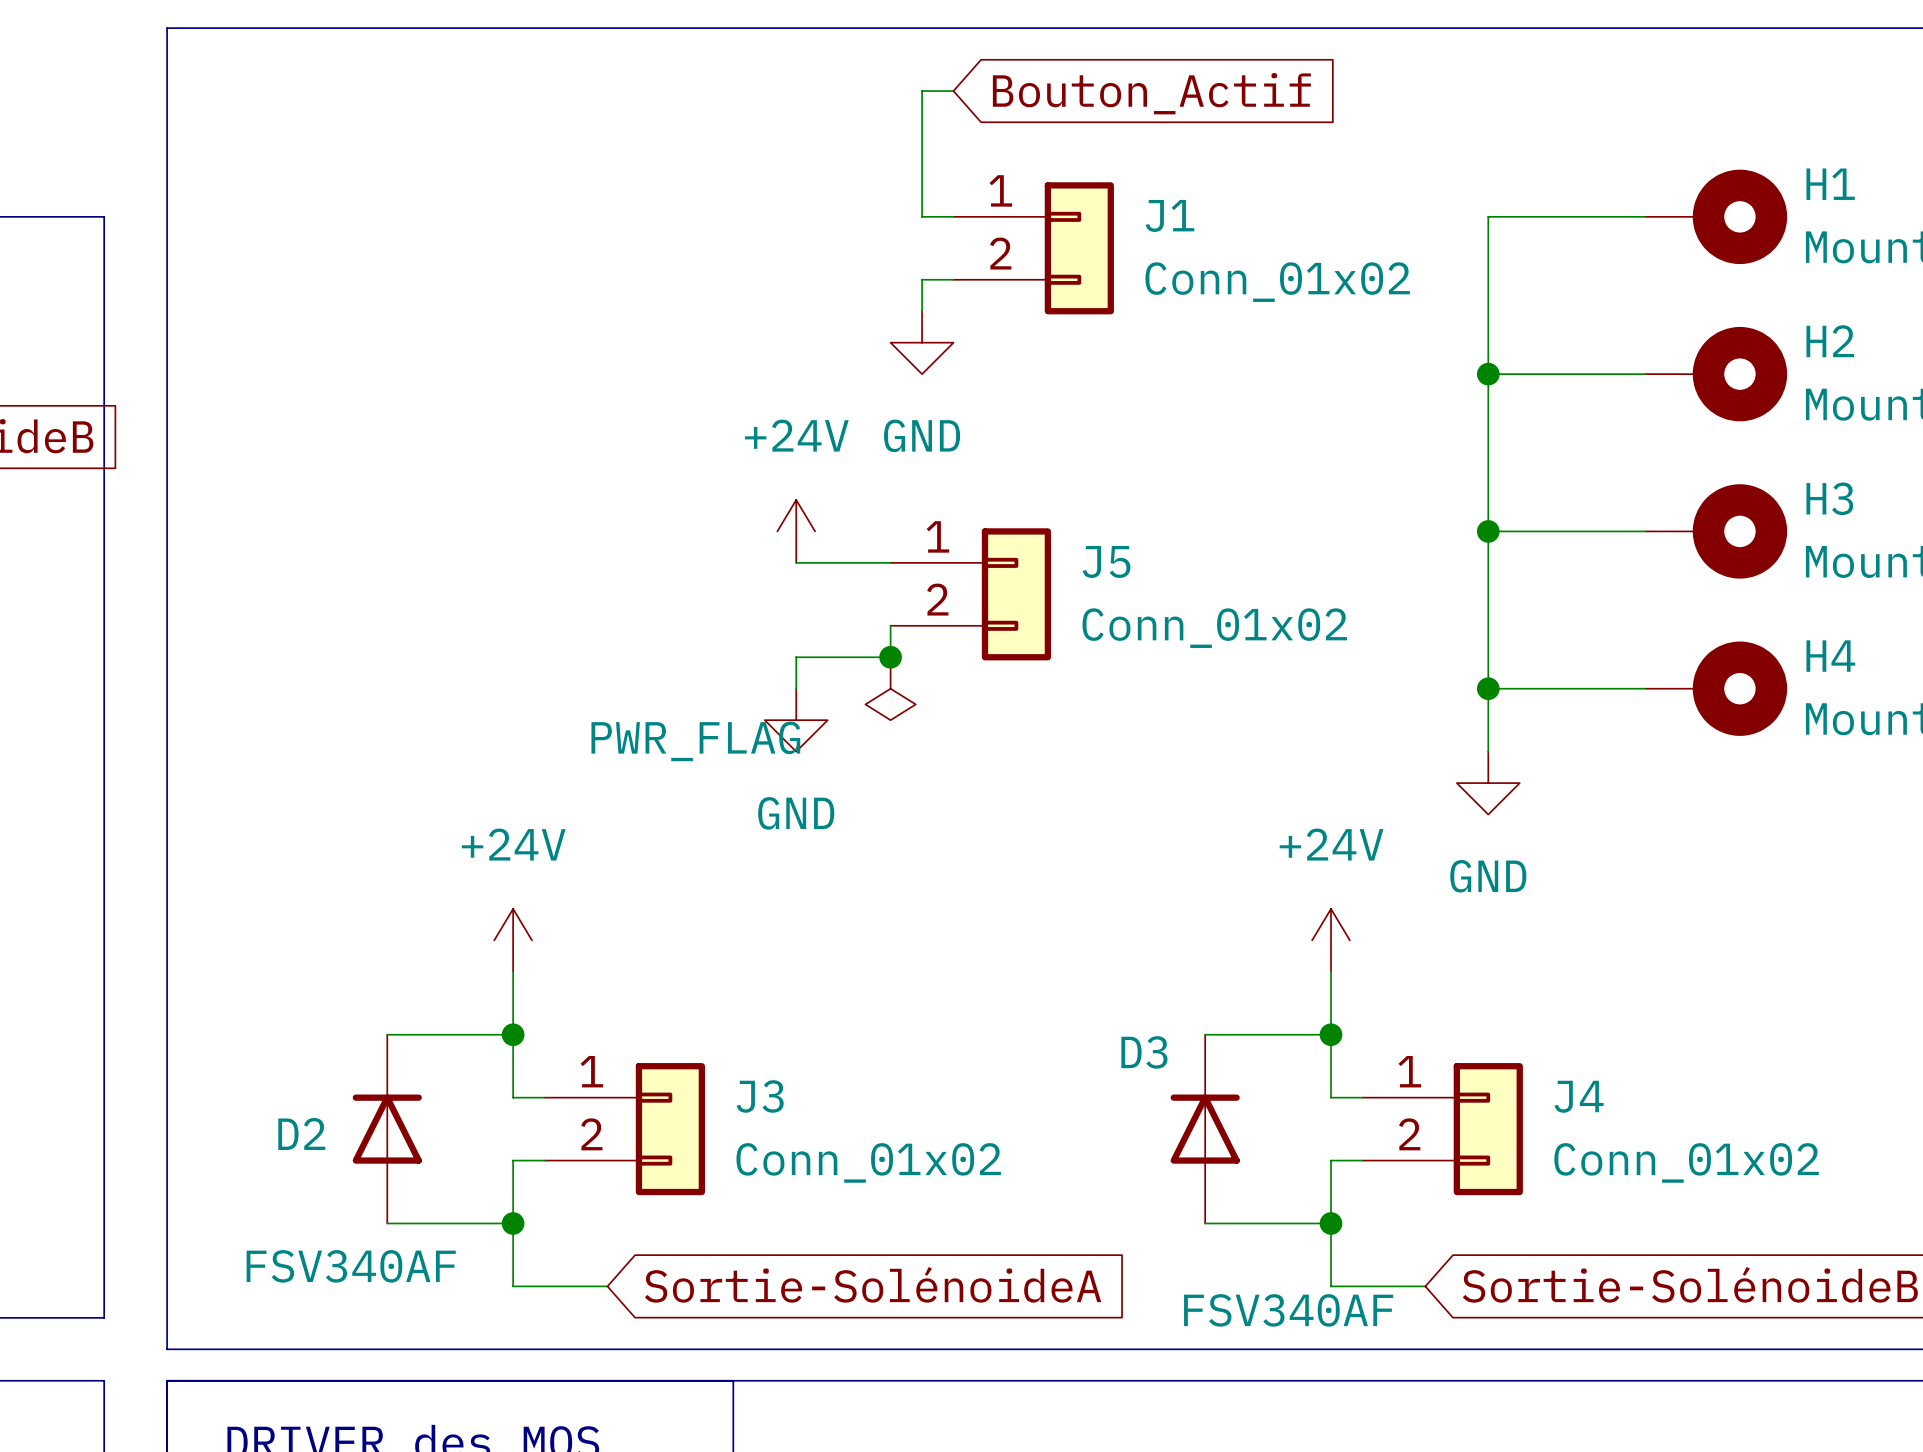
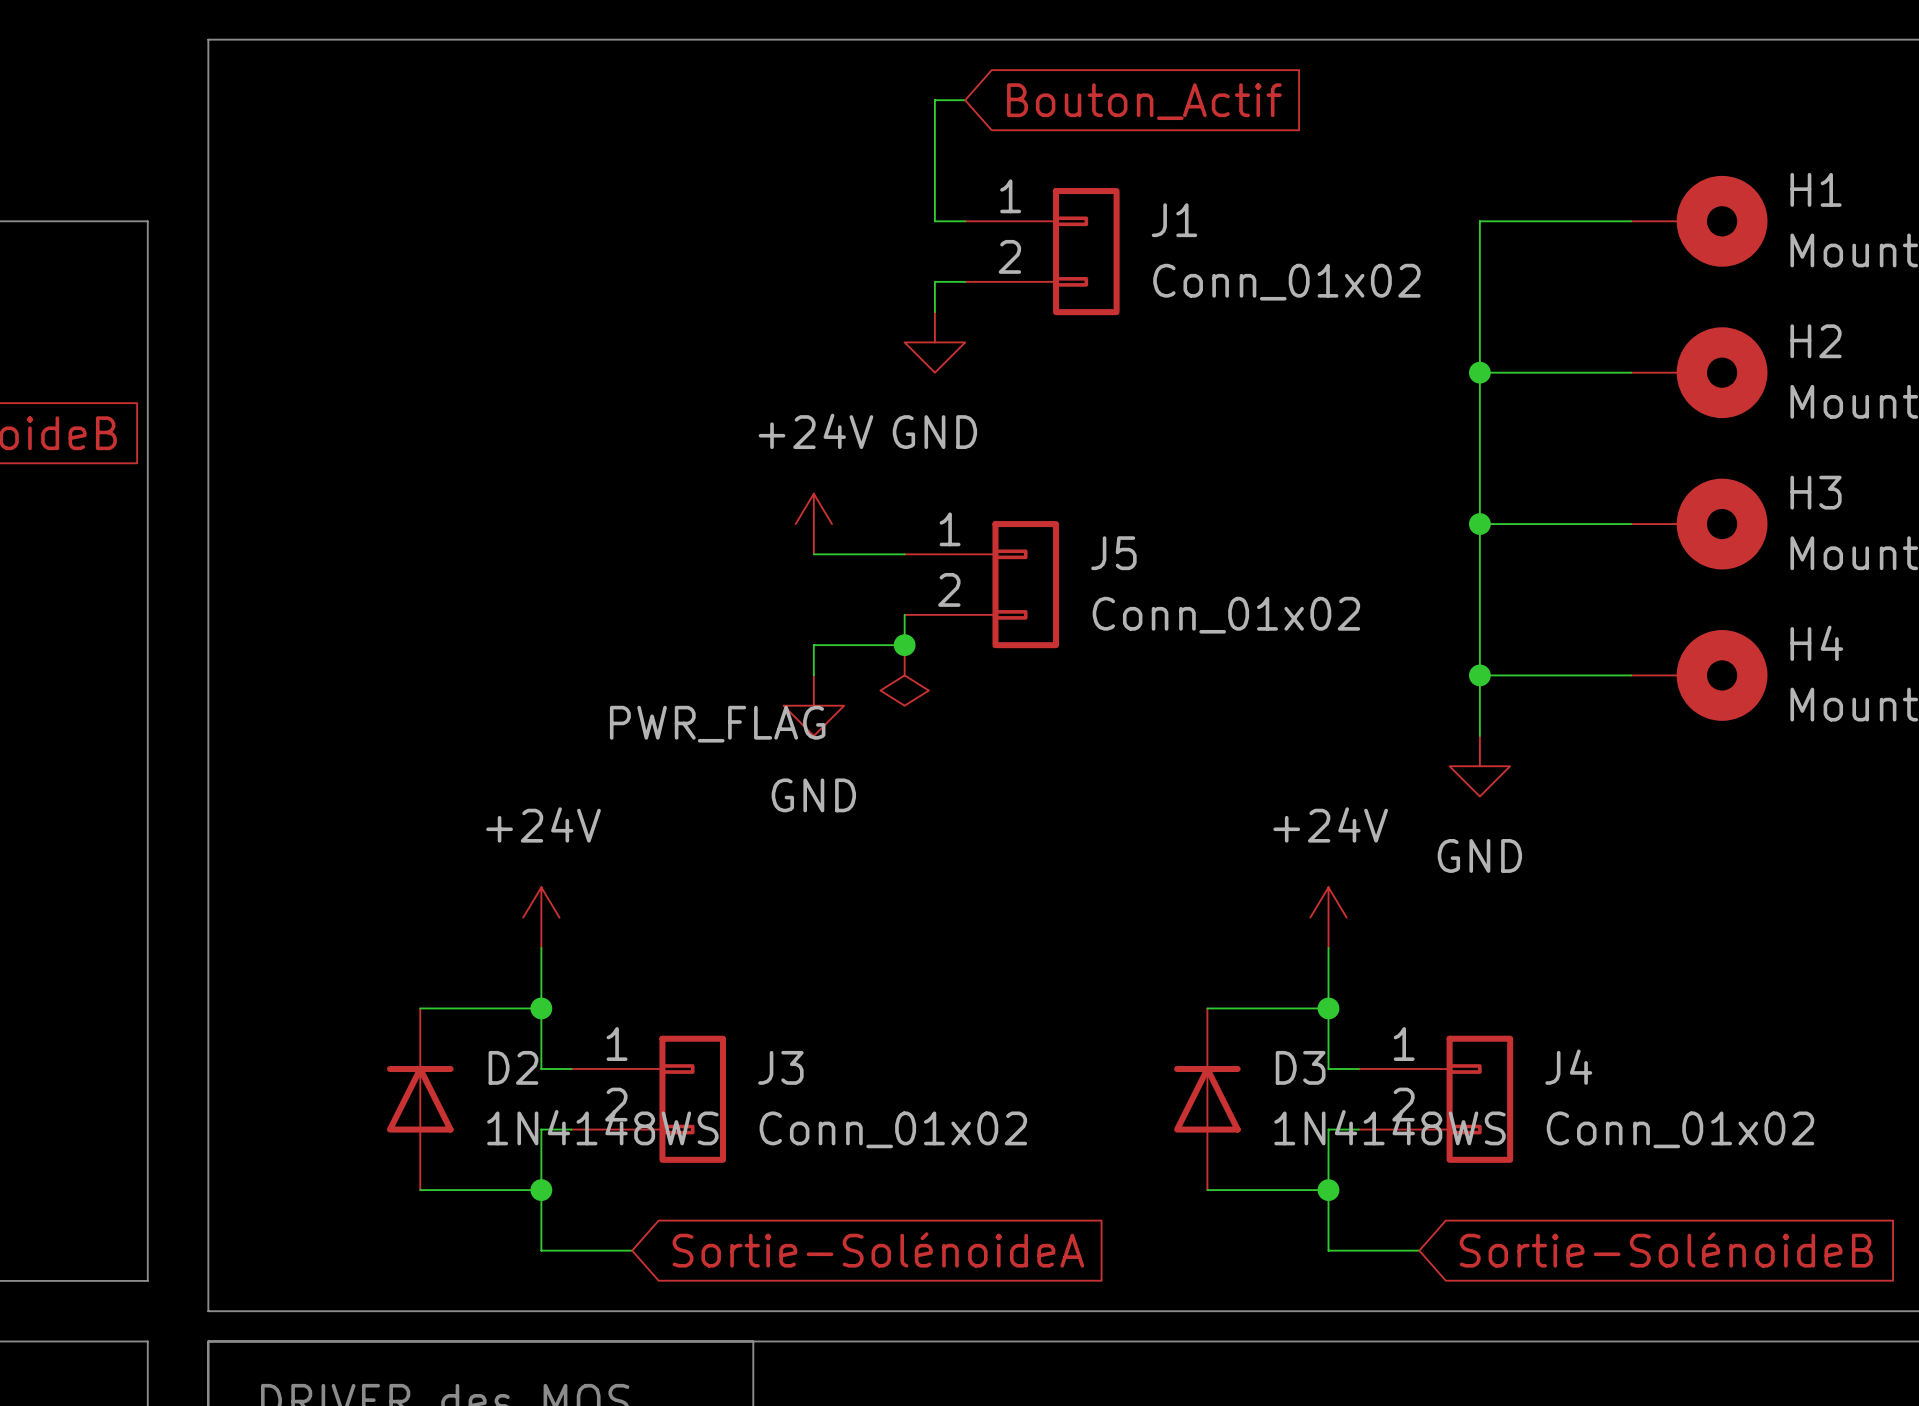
D3 name position: D3 (1144, 1052) -> D3 (1300, 1067)
D2 name position: D2 (301, 1133) -> D2 (513, 1067)
D2 value: FSV340AF (351, 1266) -> 1N4148WS (602, 1127)
D3 value: FSV340AF (1288, 1310) -> 1N4148WS (1390, 1127)

